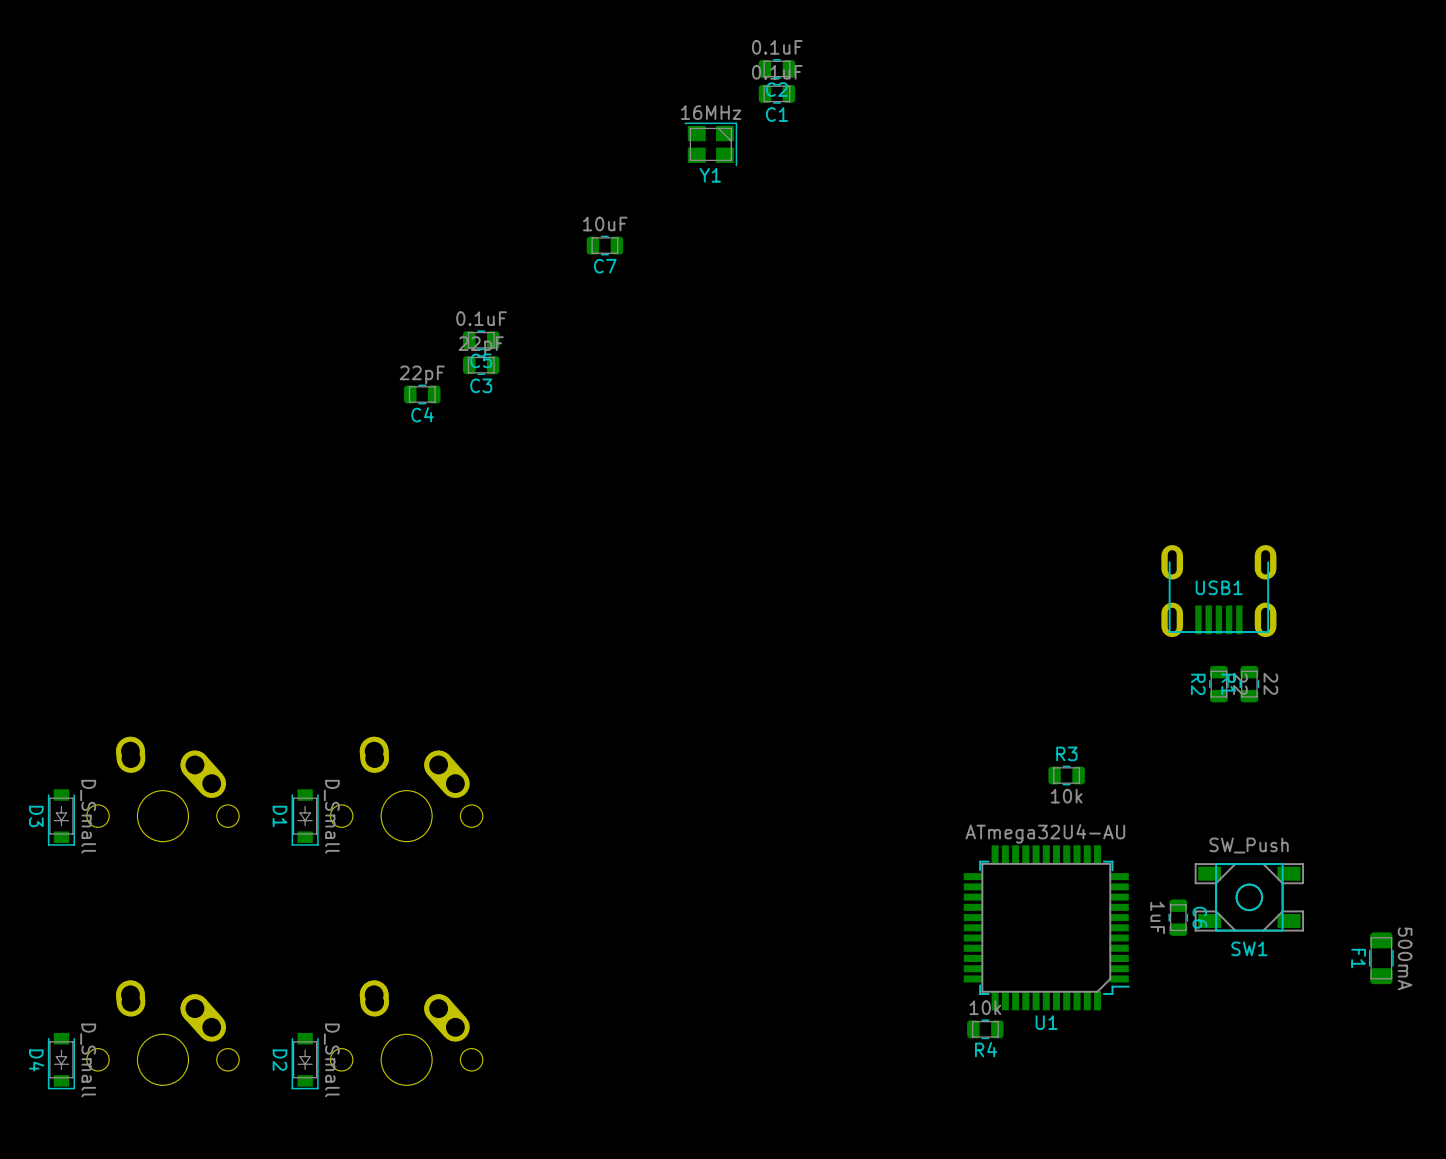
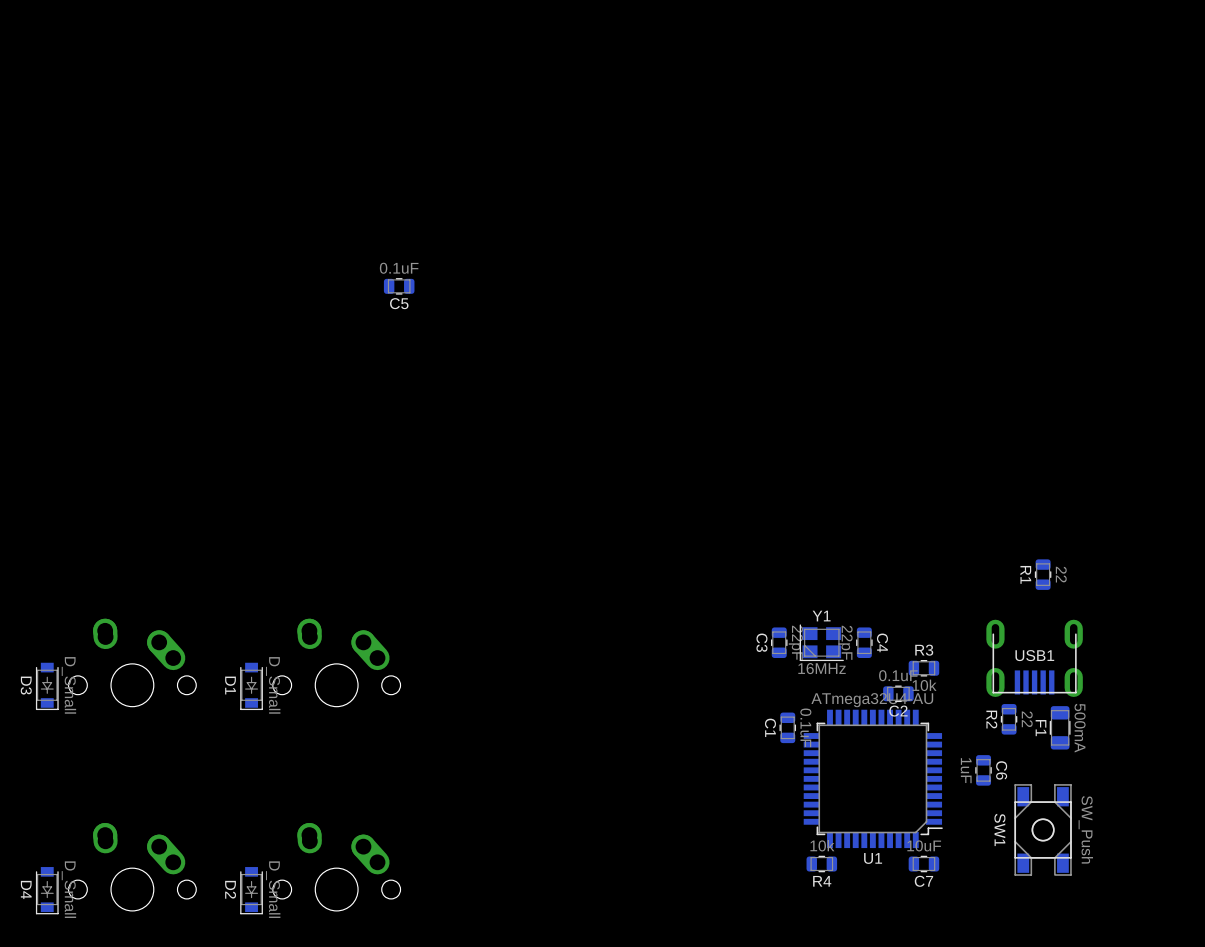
C2 position: (776, 68) -> (898, 693)
C1 rotation: 0° (776, 93) -> 90° clockwise (787, 727)
C1 position: (776, 93) -> (787, 727)
Y1 rotation: 0° (710, 144) -> 180° (821, 642)
Y1 position: (710, 144) -> (821, 642)
C7 position: (604, 245) -> (923, 864)
C3 rotation: 0° (481, 365) -> 90° clockwise (779, 642)
C3 position: (481, 365) -> (779, 642)
C4 value position: 22pF (422, 375) -> 22pF (845, 642)
C4 rotation: 0° (422, 394) -> 90° clockwise (864, 642)
C4 position: (422, 394) -> (864, 642)
C4 name position: C4 (422, 414) -> C4 (882, 642)
USB1 position: (1218, 591) -> (1034, 658)
R2 position: (1218, 684) -> (1009, 719)
R3 position: (1066, 775) -> (923, 668)
SW1 rotation: 0° (1249, 897) -> 90° clockwise (1043, 829)
SW1 position: (1249, 897) -> (1043, 829)
F1 position: (1381, 958) -> (1060, 727)

